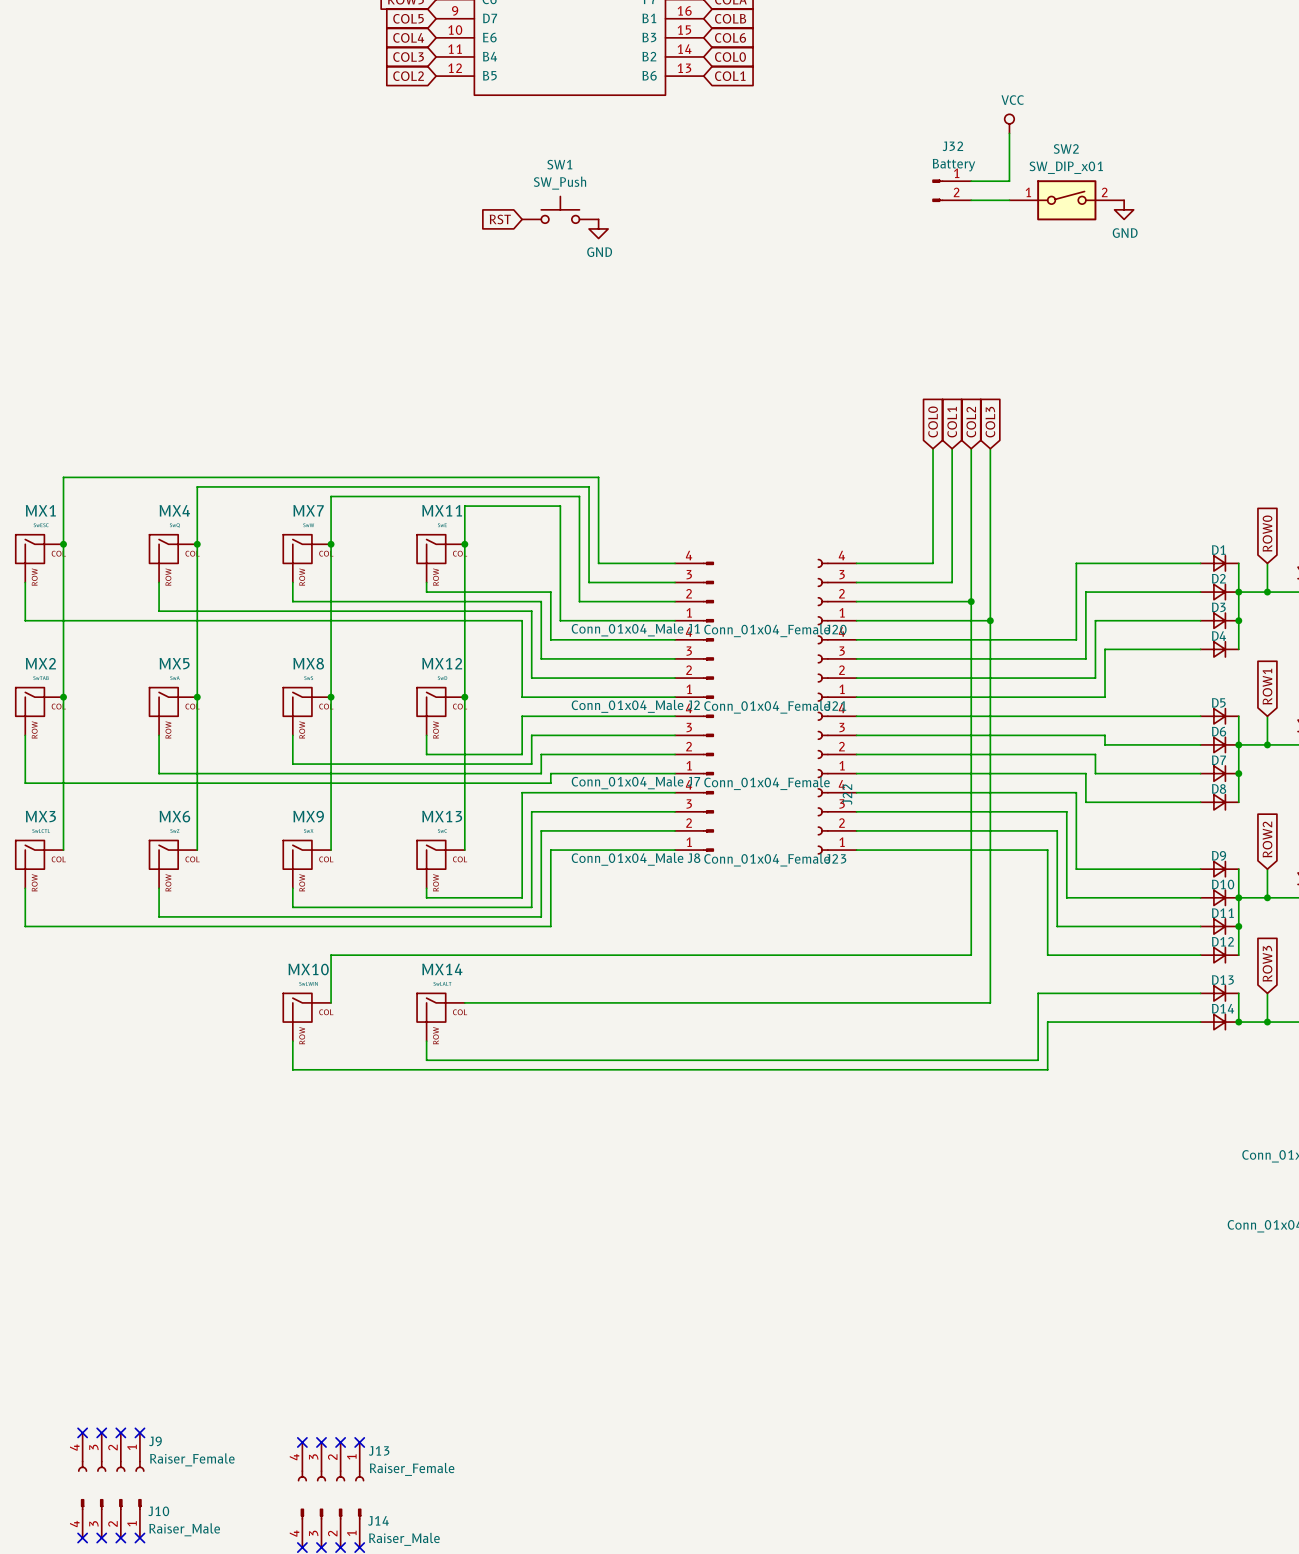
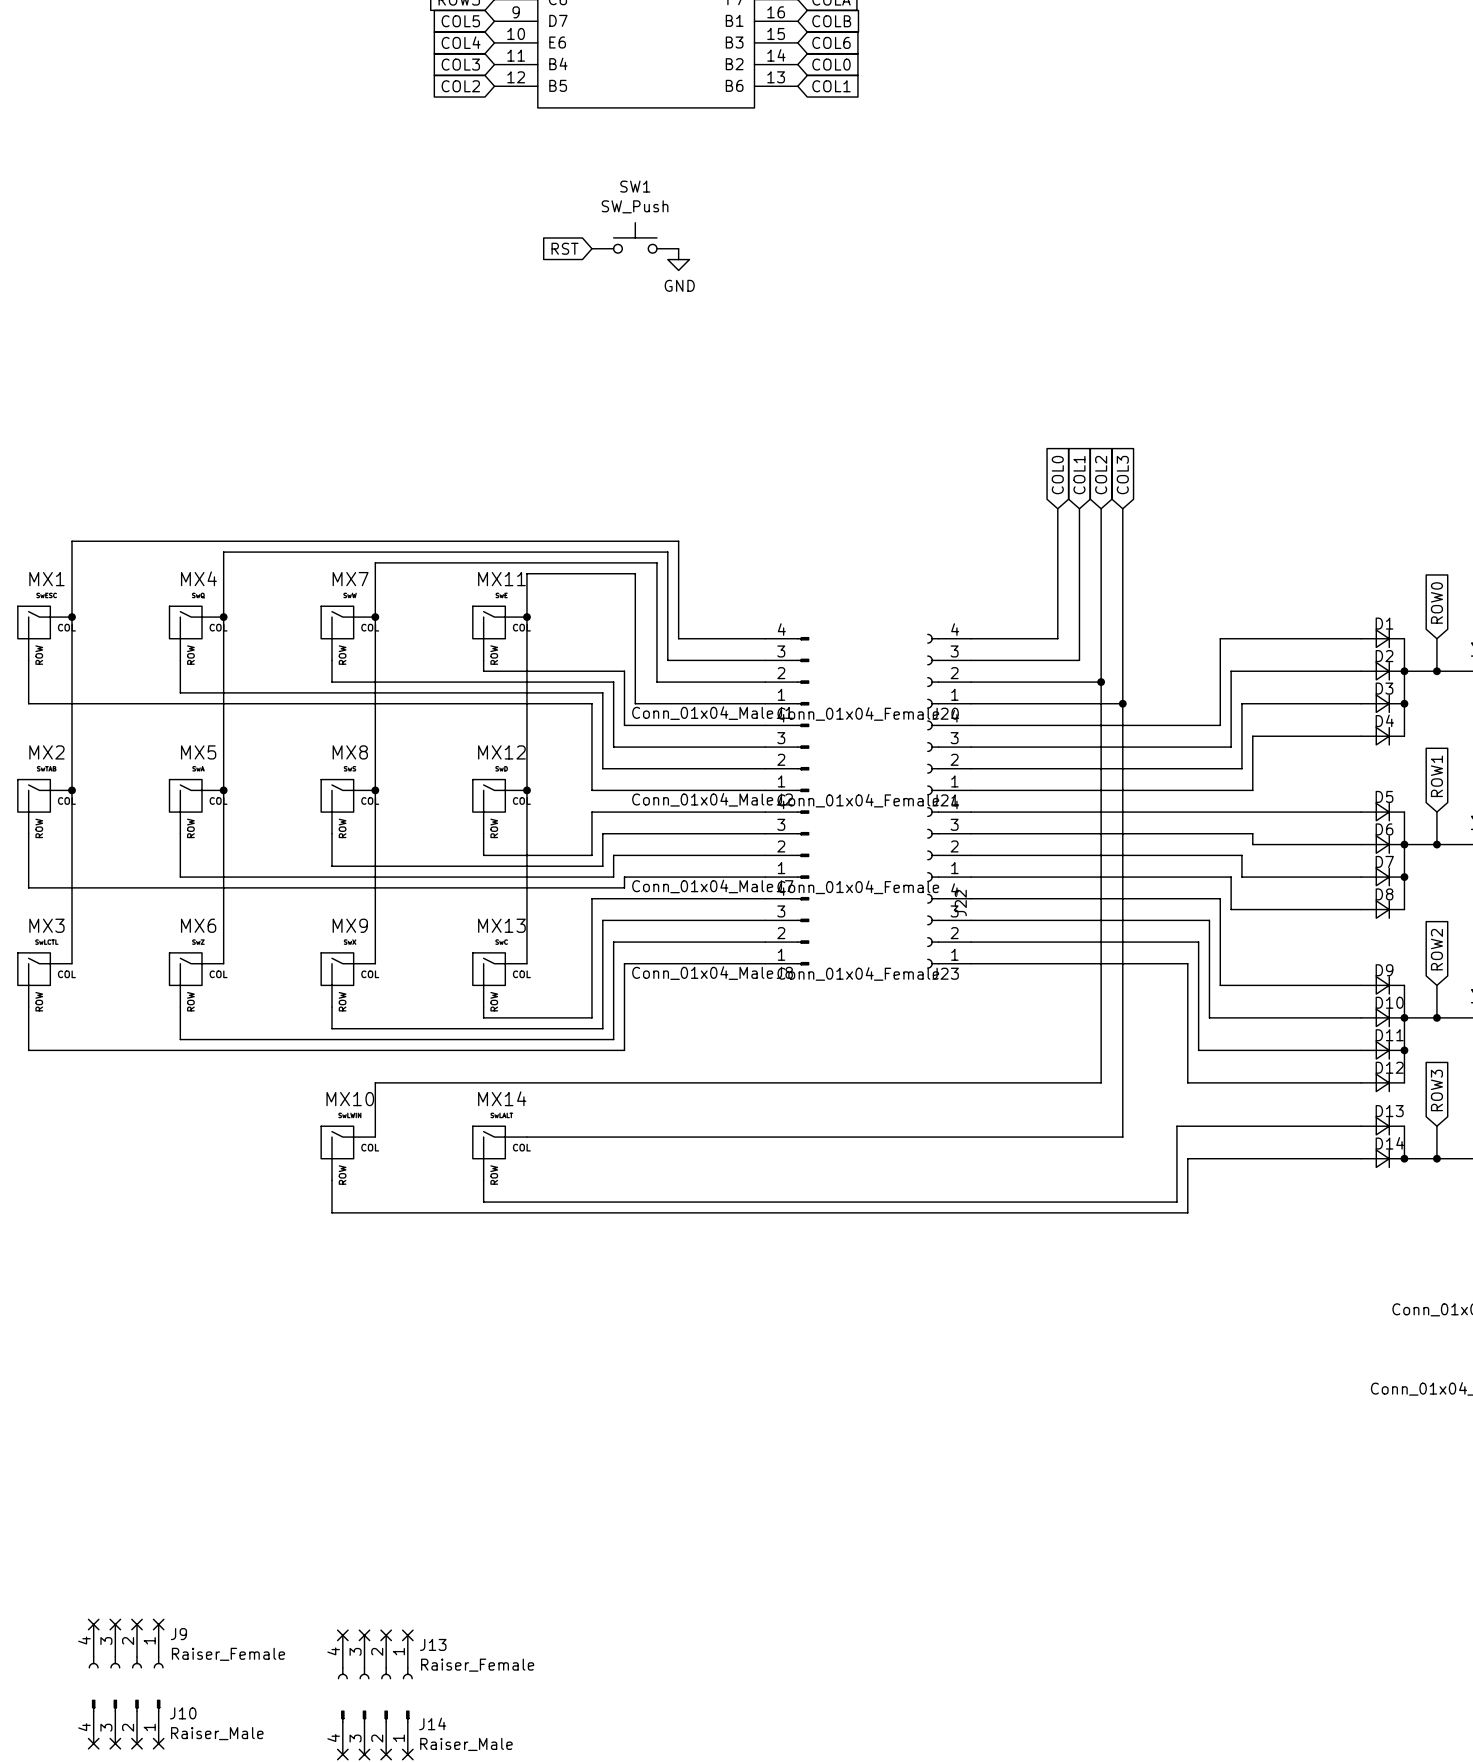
power symbol: VCC (1009, 123) -> none
wire: (1009, 133) (1009, 181) (971, 181) -> none
J32: Battery (951, 190) -> none
wire: (971, 200) (1009, 200) -> none
SW2: SW_DIP_x01 (1066, 200) -> none
power symbol: GND (1124, 209) -> none

